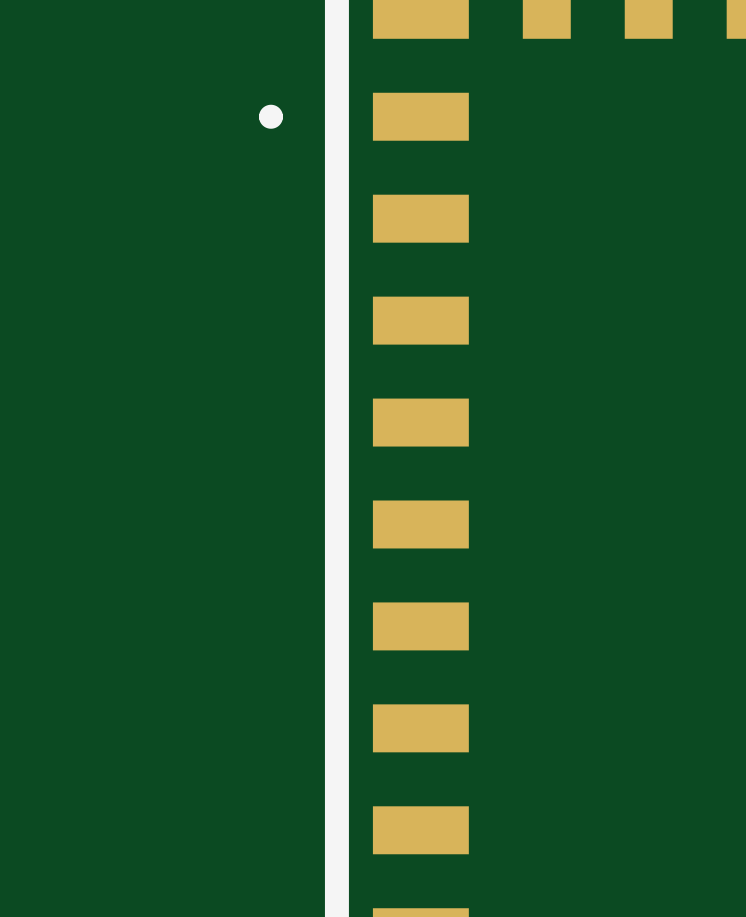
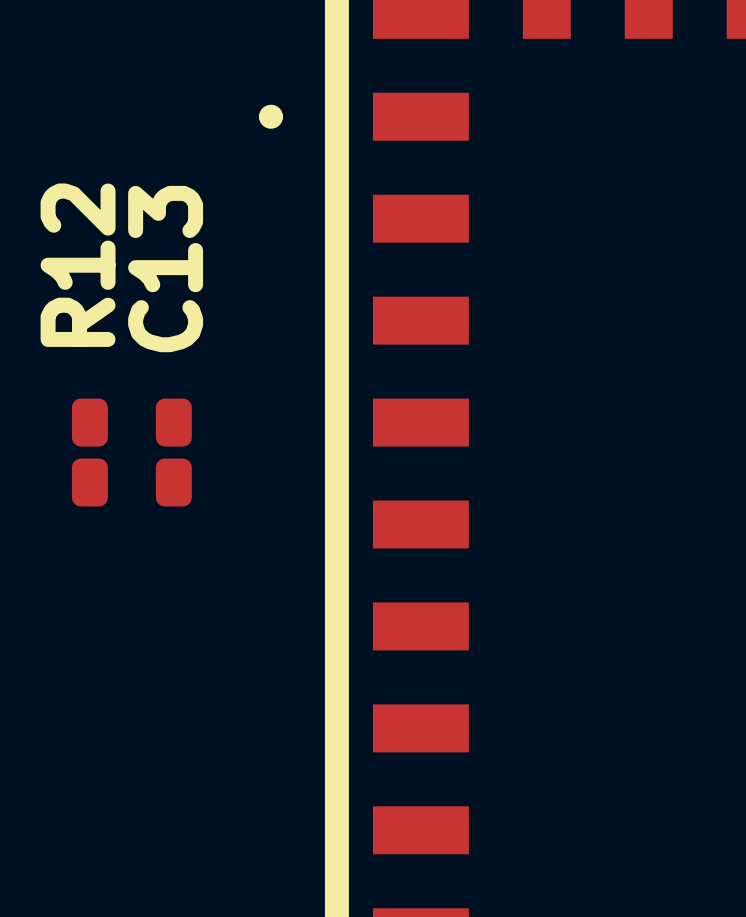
R12: none -> (89, 452)
C13: none -> (173, 452)

